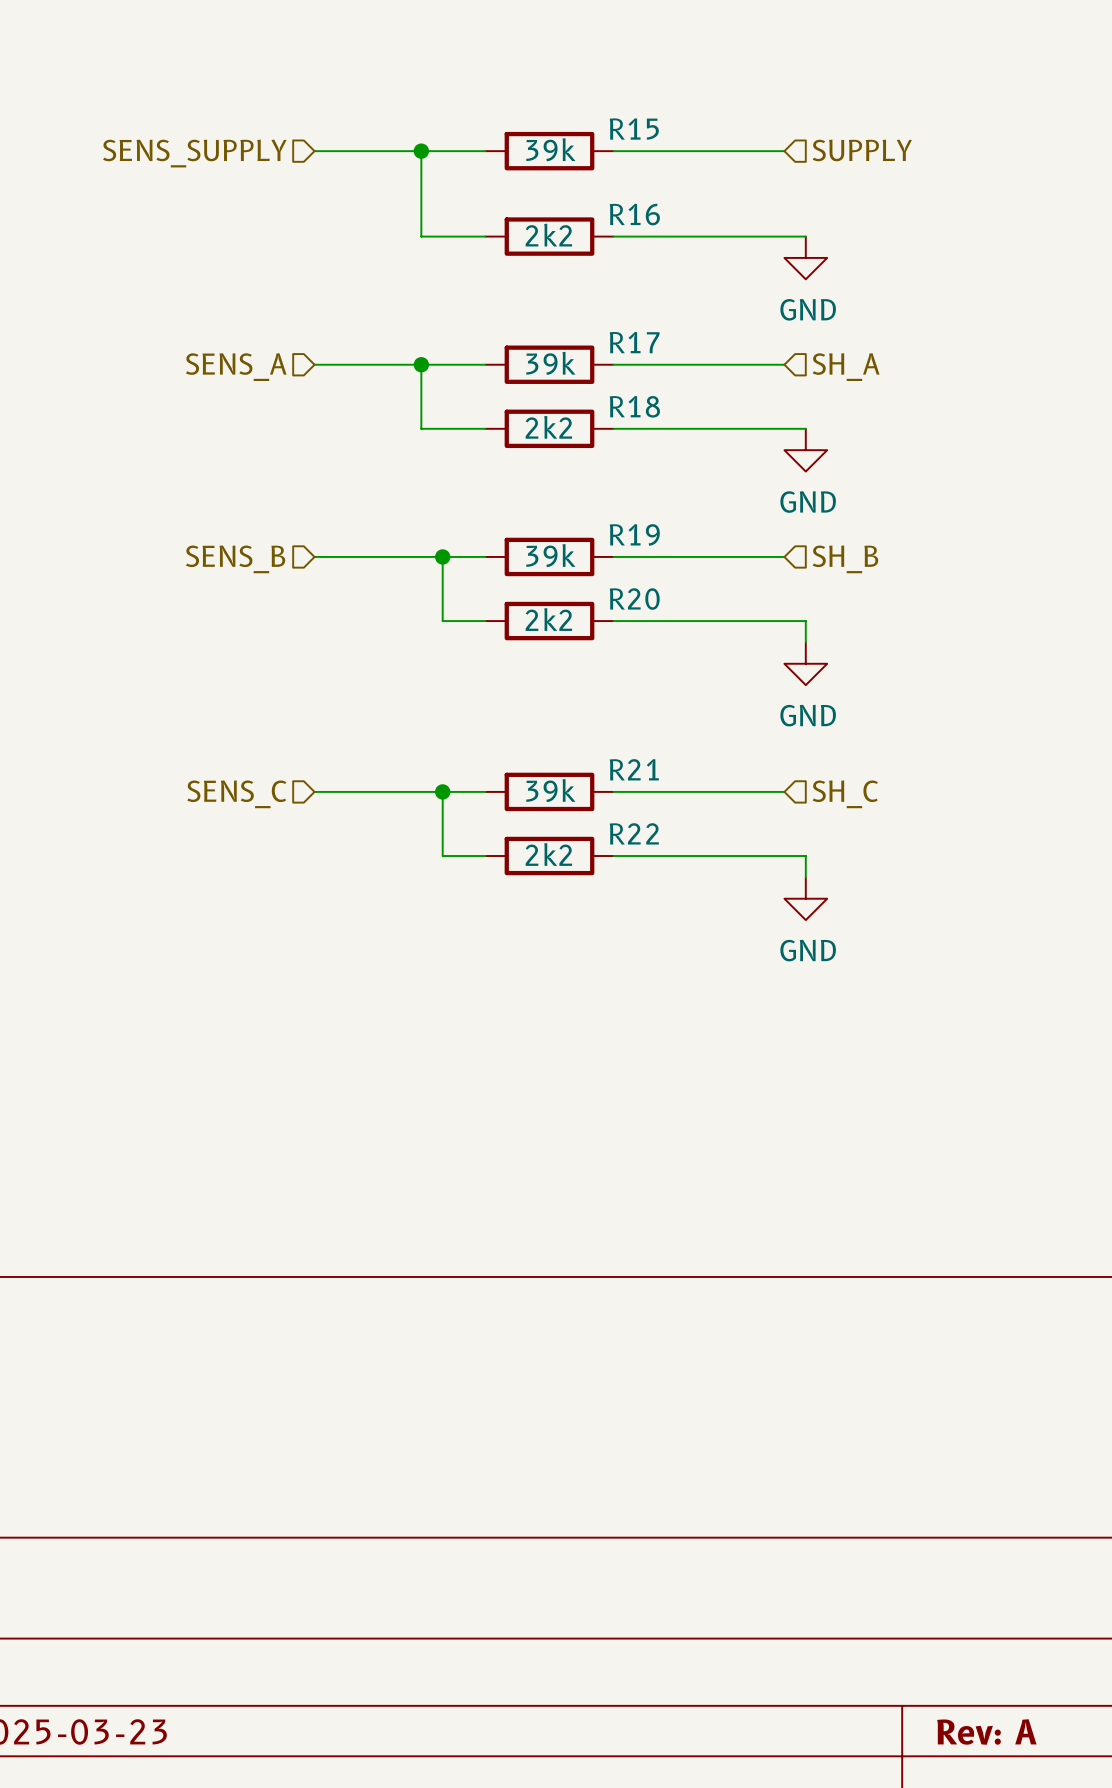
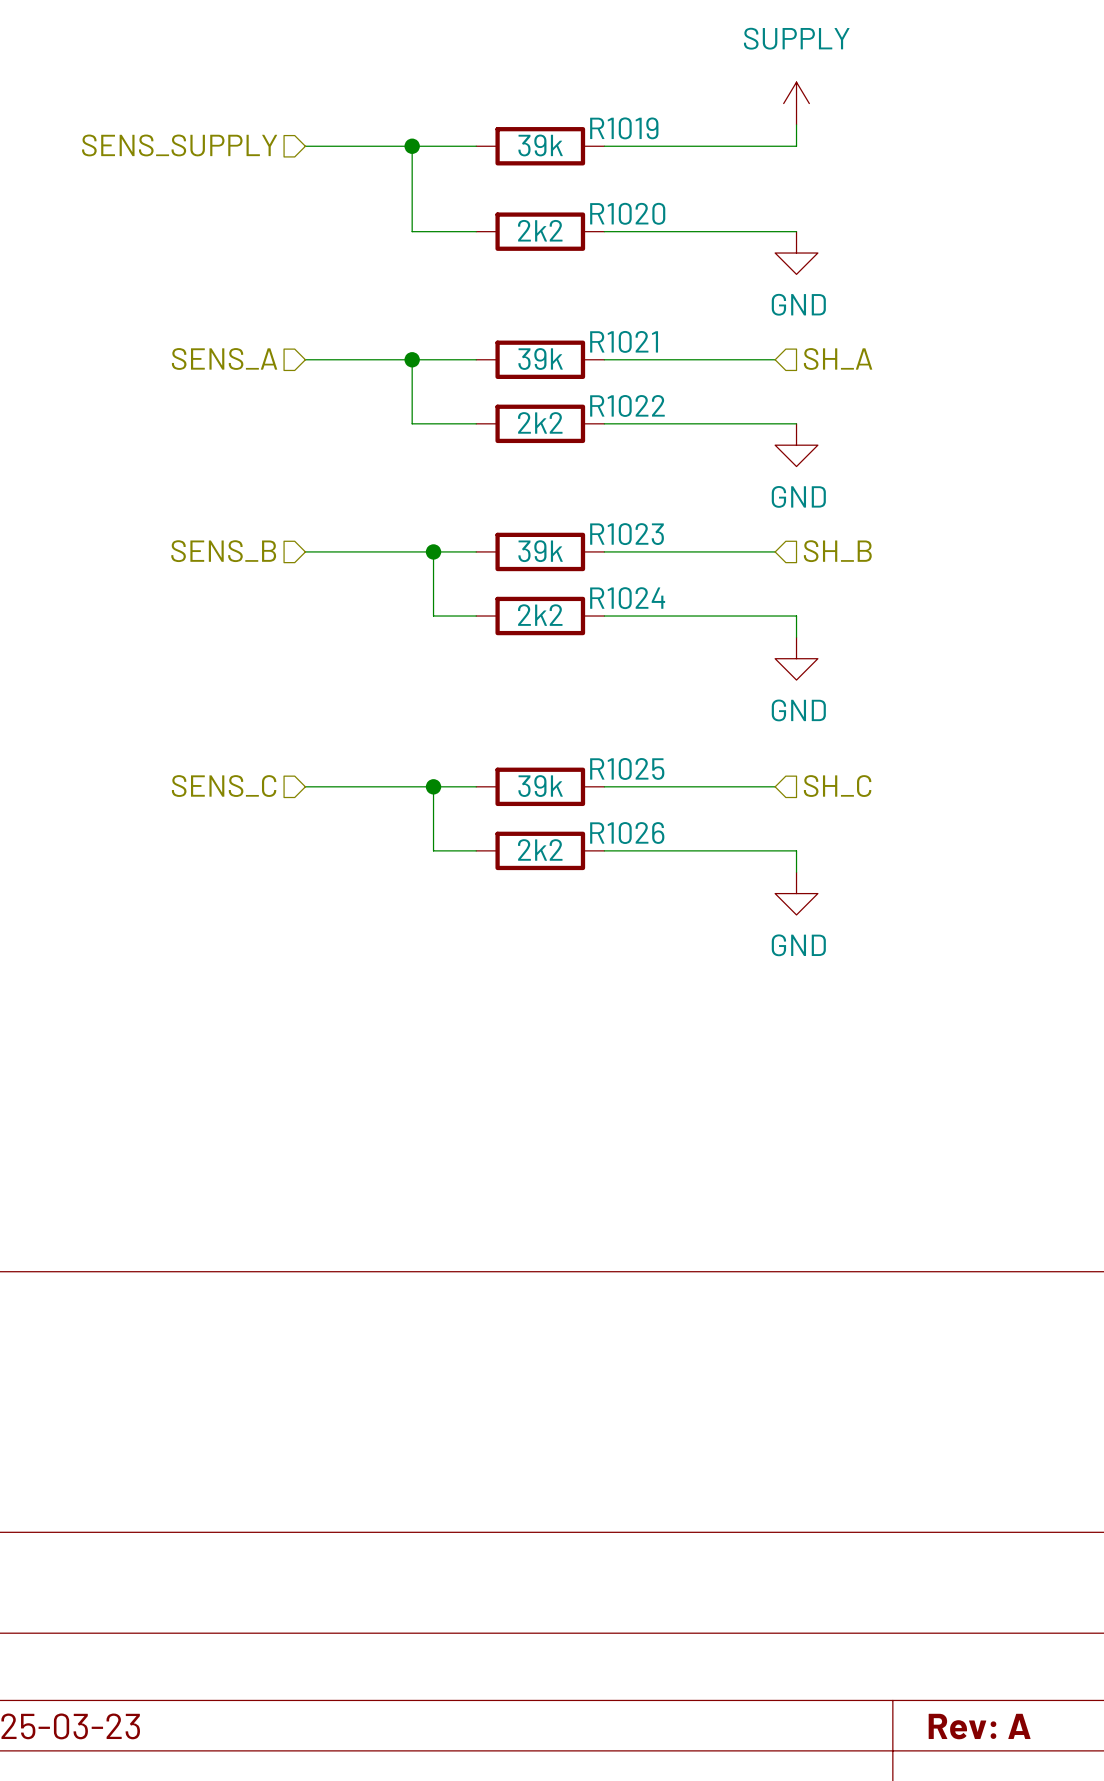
power symbol: none -> SUPPLY (796, 103)
R15 name: R15 (634, 128) -> R1019 (624, 128)
wire: none -> (796, 124) (796, 146) (775, 146)
hierarchical label: SUPPLY (862, 150) -> none
R16 name: R16 (634, 214) -> R1020 (627, 213)
R17 name: R17 (634, 342) -> R1021 (624, 341)
R18 name: R18 (634, 406) -> R1022 (627, 405)
R19 name: R19 (634, 534) -> R1023 (627, 534)
R20 name: R20 (634, 599) -> R1024 (627, 598)
R21 name: R21 (634, 769) -> R1025 (627, 768)
R22 name: R22 (634, 833) -> R1026 (627, 833)

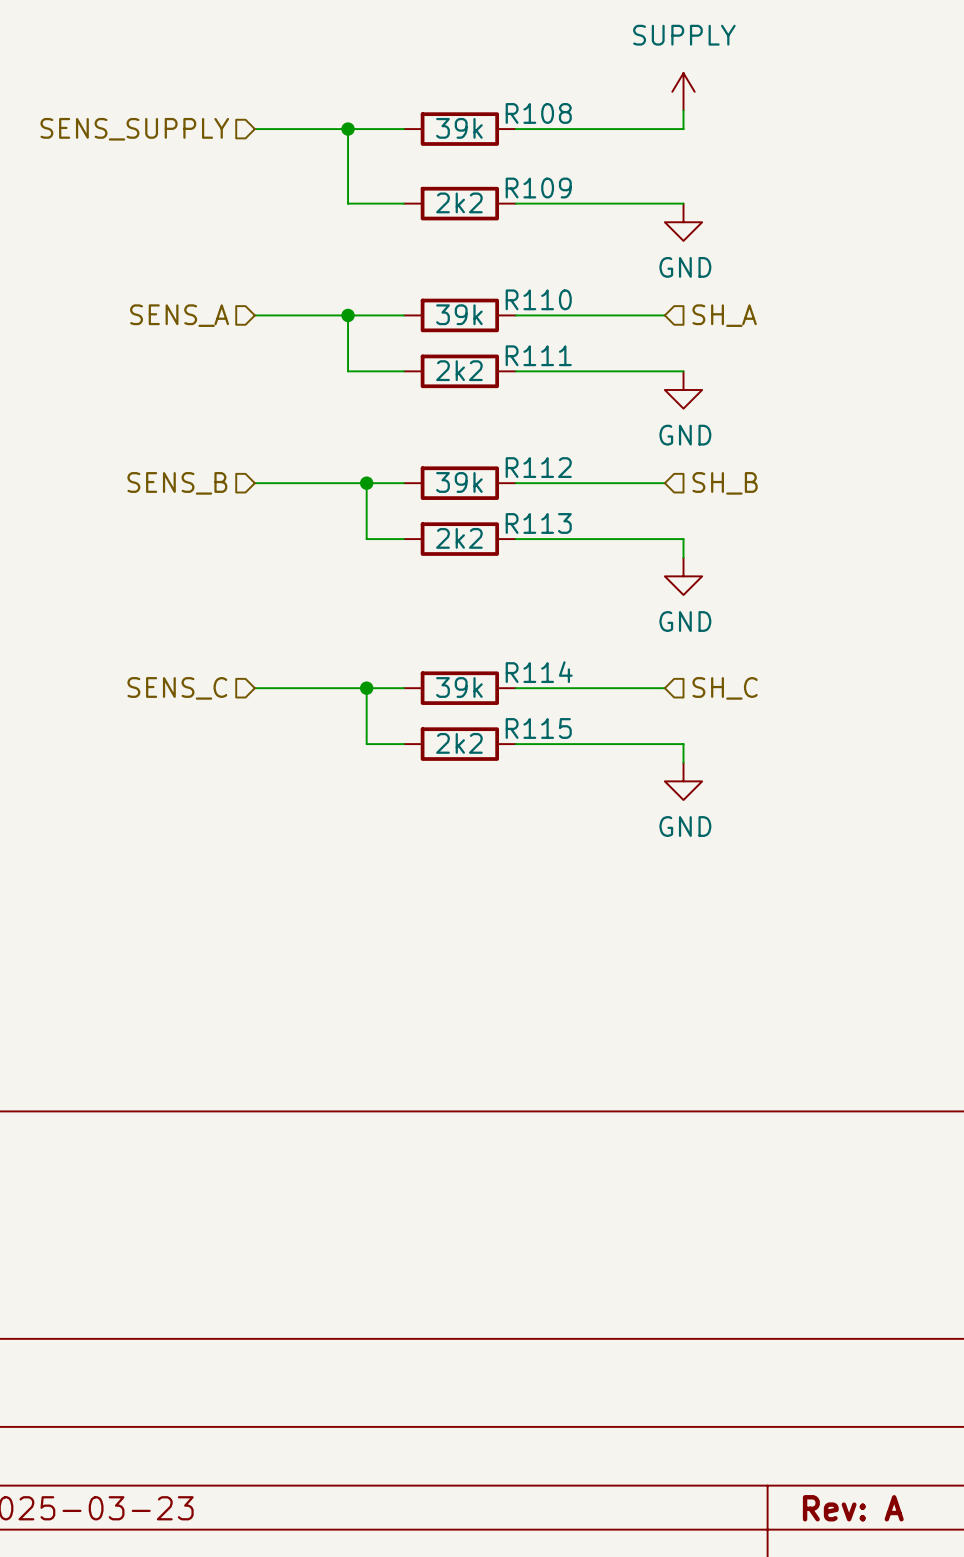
R1019 name: R1019 (624, 128) -> R108 (538, 113)
R1020 name: R1020 (627, 213) -> R109 (538, 188)
R1021 name: R1021 (624, 341) -> R110 (538, 299)
R1022 name: R1022 (627, 405) -> R111 (538, 355)
R1023 name: R1023 (627, 534) -> R112 (538, 467)
R1024 name: R1024 (627, 598) -> R113 (538, 523)
R1025 name: R1025 (627, 768) -> R114 (539, 672)
R1026 name: R1026 (627, 833) -> R115 (538, 728)

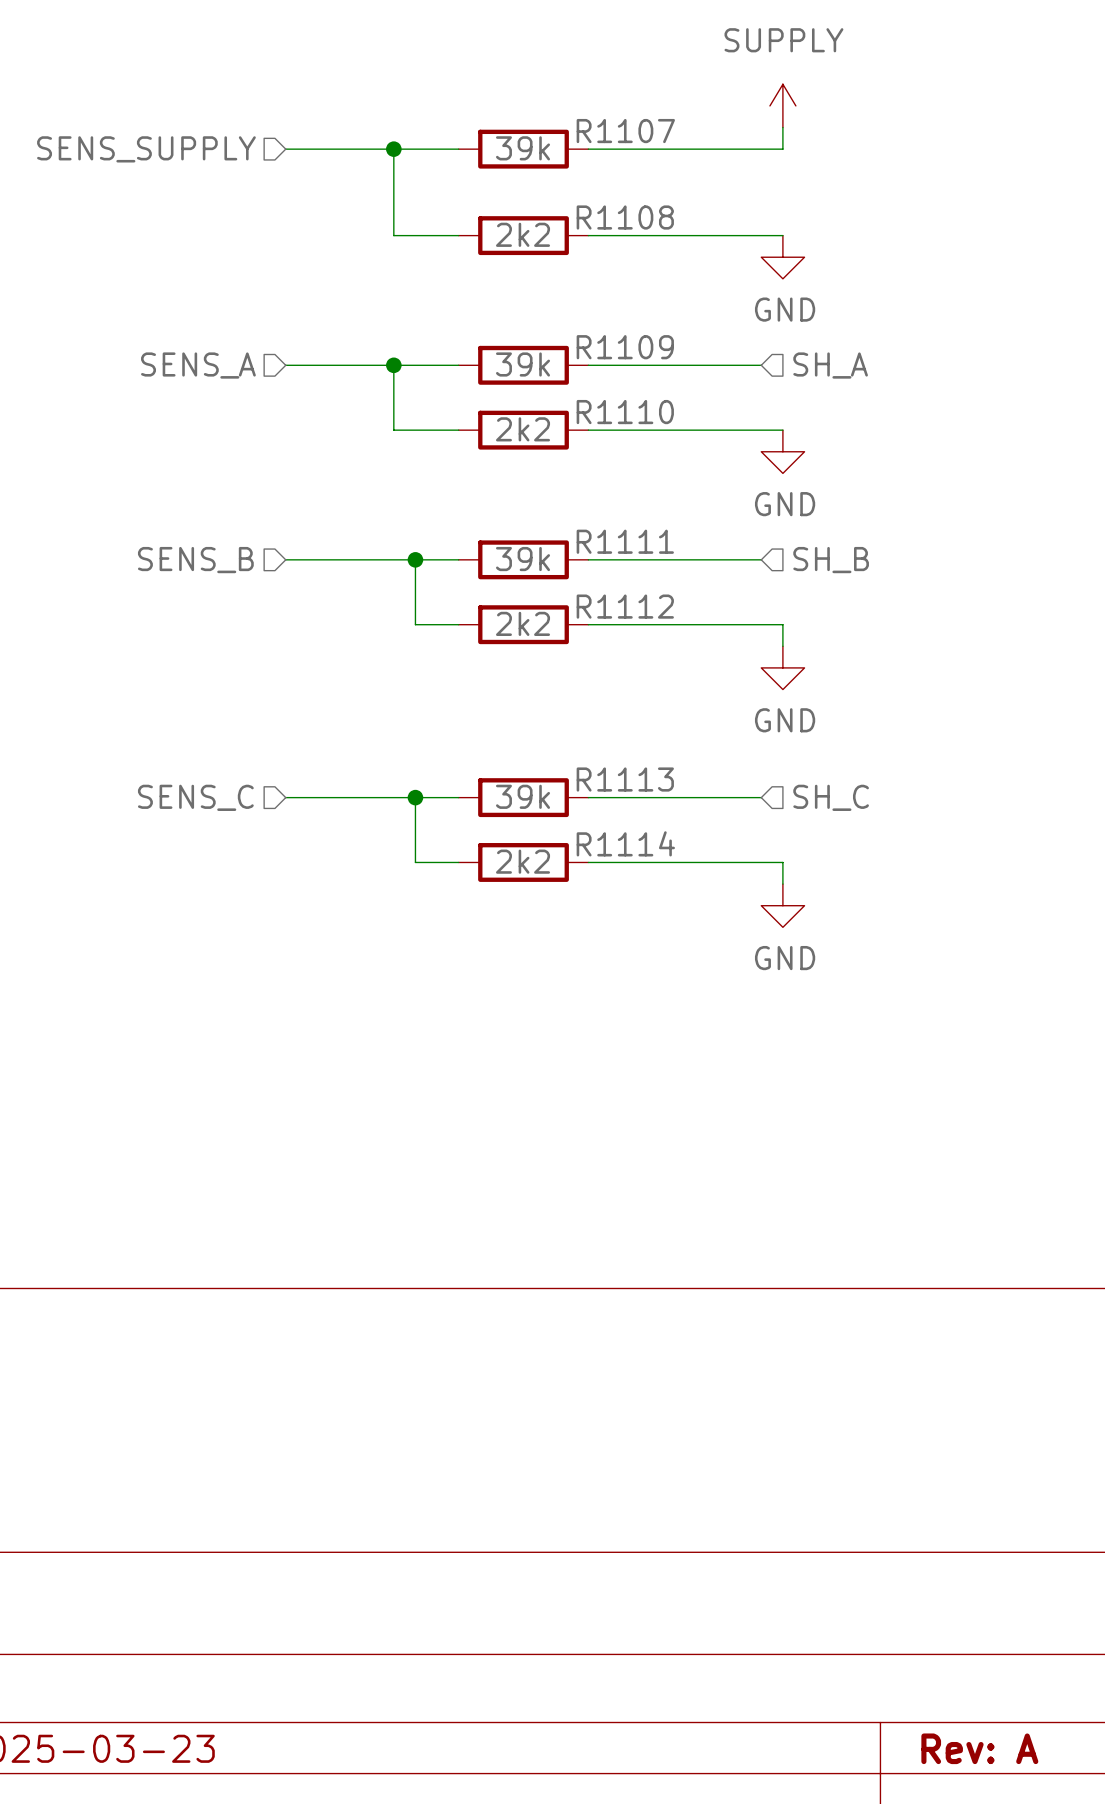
R108 name: R108 (538, 113) -> R1107 (625, 131)
R109 name: R109 (538, 188) -> R1108 (625, 217)
R110 name: R110 (538, 299) -> R1109 (625, 347)
R111 name: R111 (538, 355) -> R1110 (625, 412)
R112 name: R112 (538, 467) -> R1111 (625, 541)
R113 name: R113 (538, 523) -> R1112 (625, 606)
R114 name: R114 (539, 672) -> R1113 (625, 779)
R115 name: R115 (538, 728) -> R1114 (625, 843)

